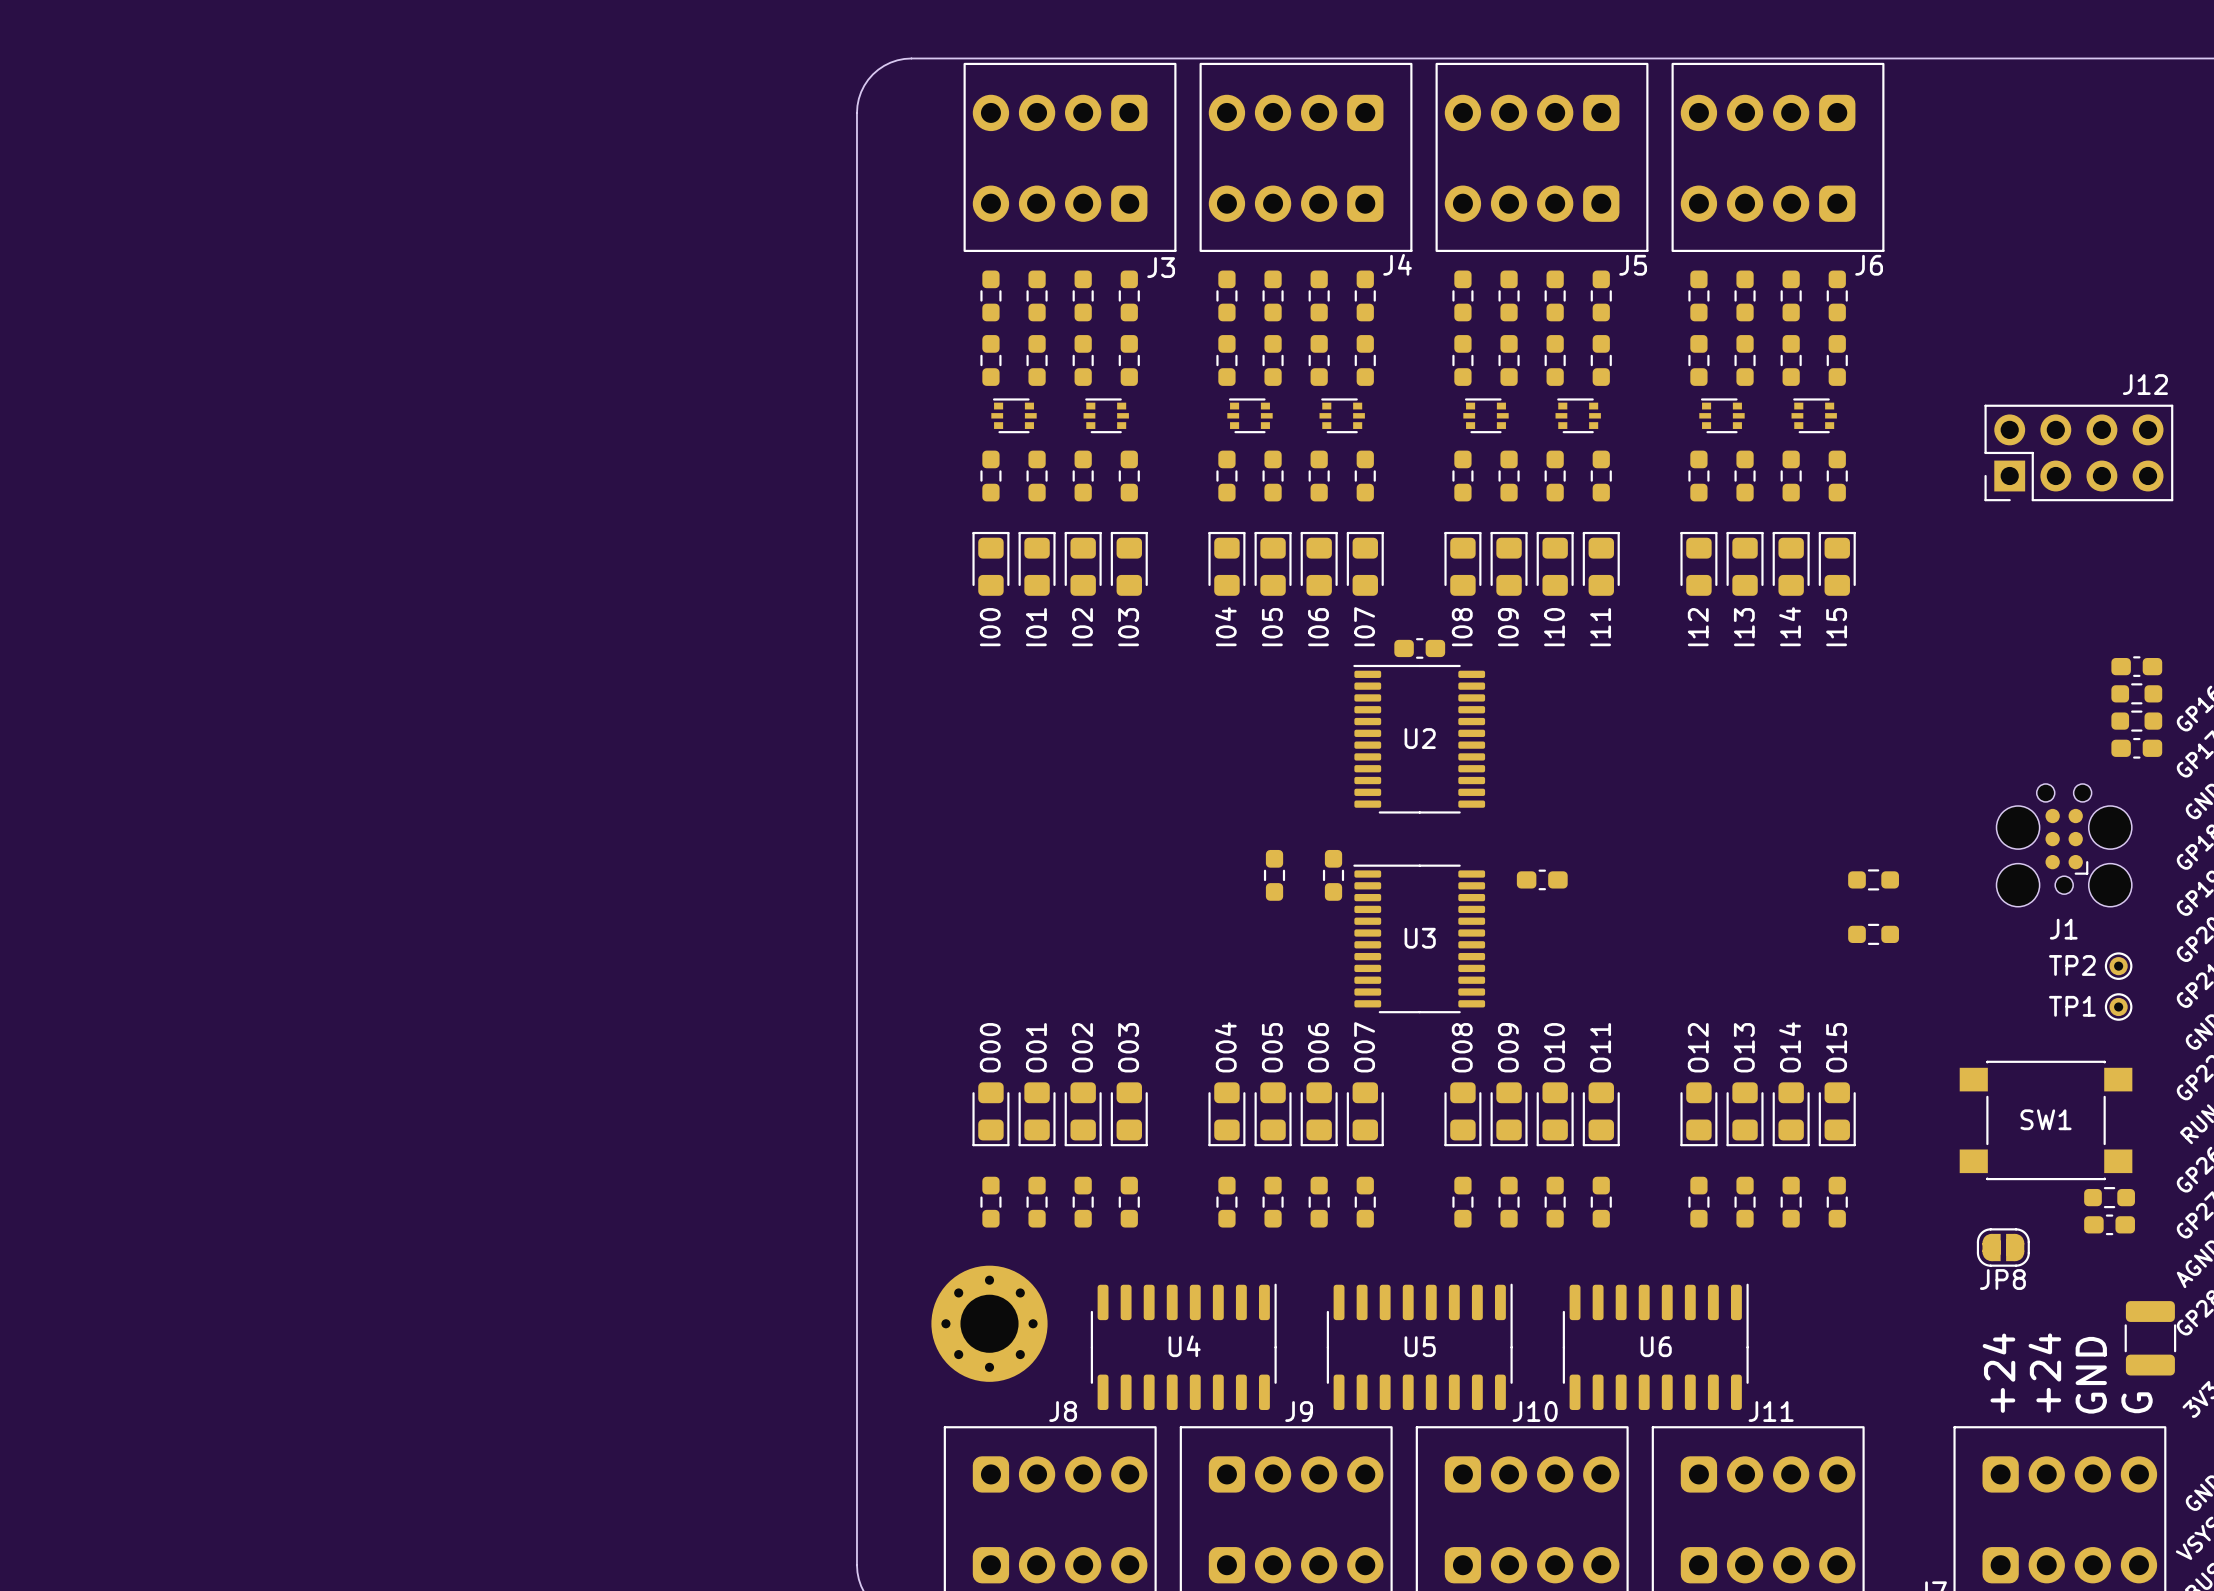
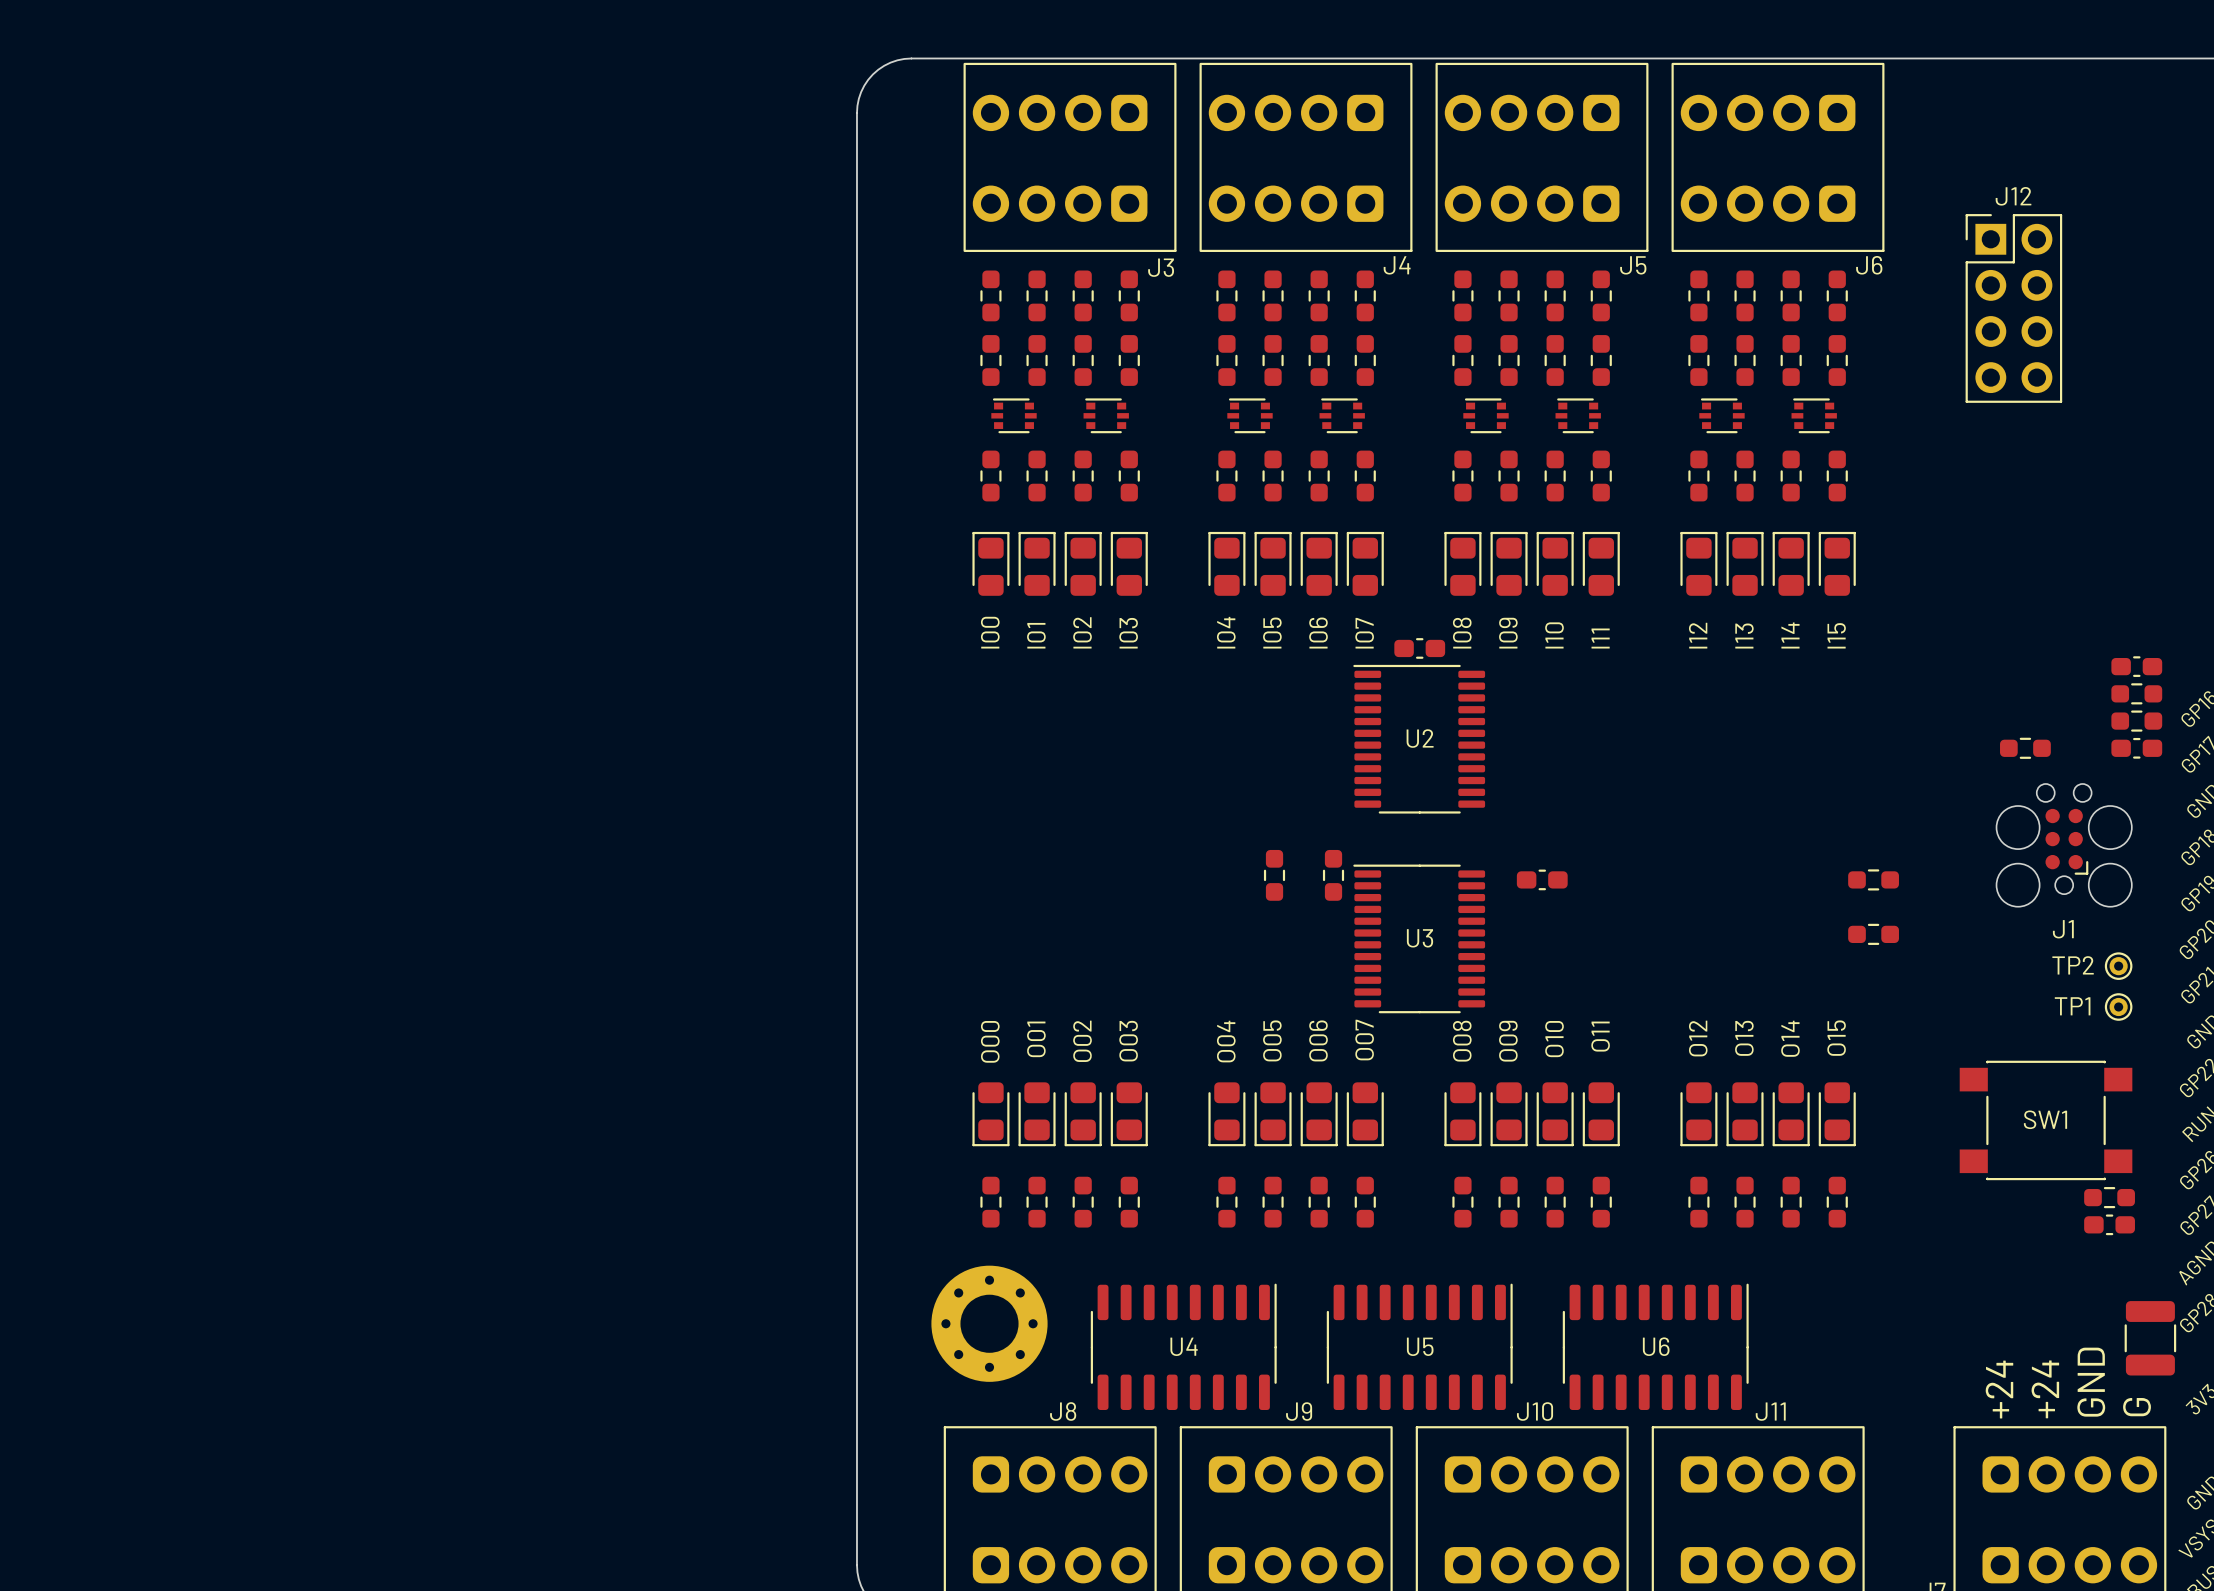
J12 name position: J12 (2145, 384) -> J12 (2013, 196)
J12 rotation: 0° (2078, 452) -> 90° clockwise (2013, 308)
J12 position: (2078, 452) -> (2013, 308)
part: none -> (2025, 748)
JP8: (2003, 1247) -> none

